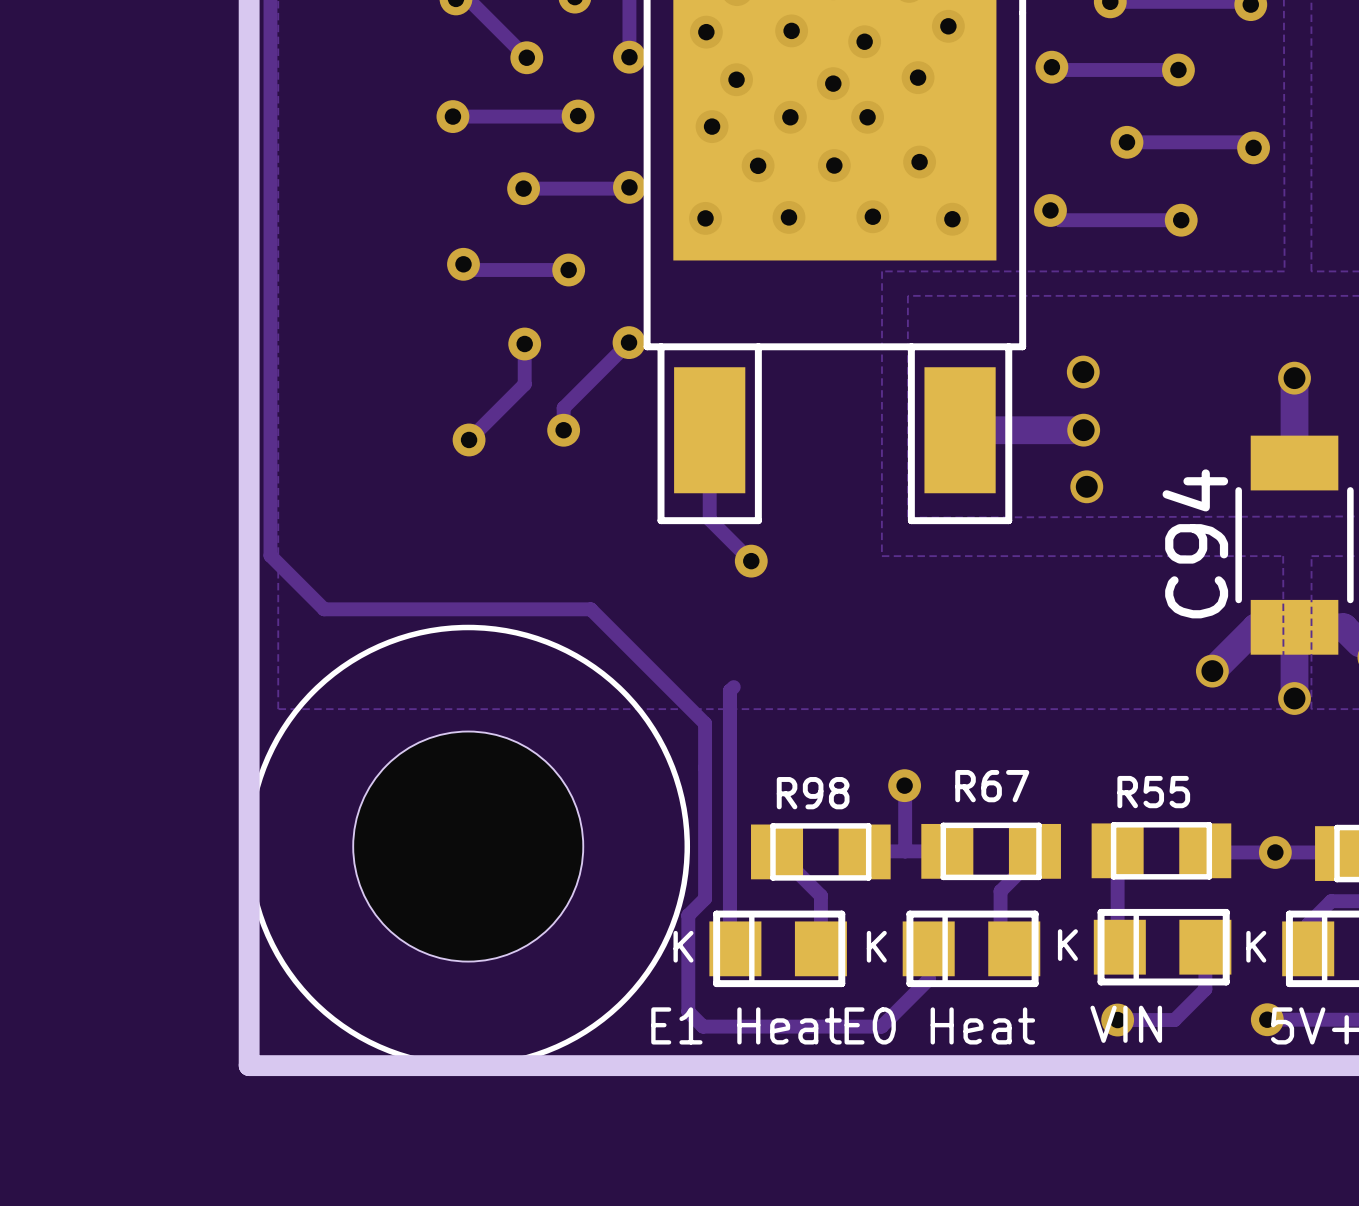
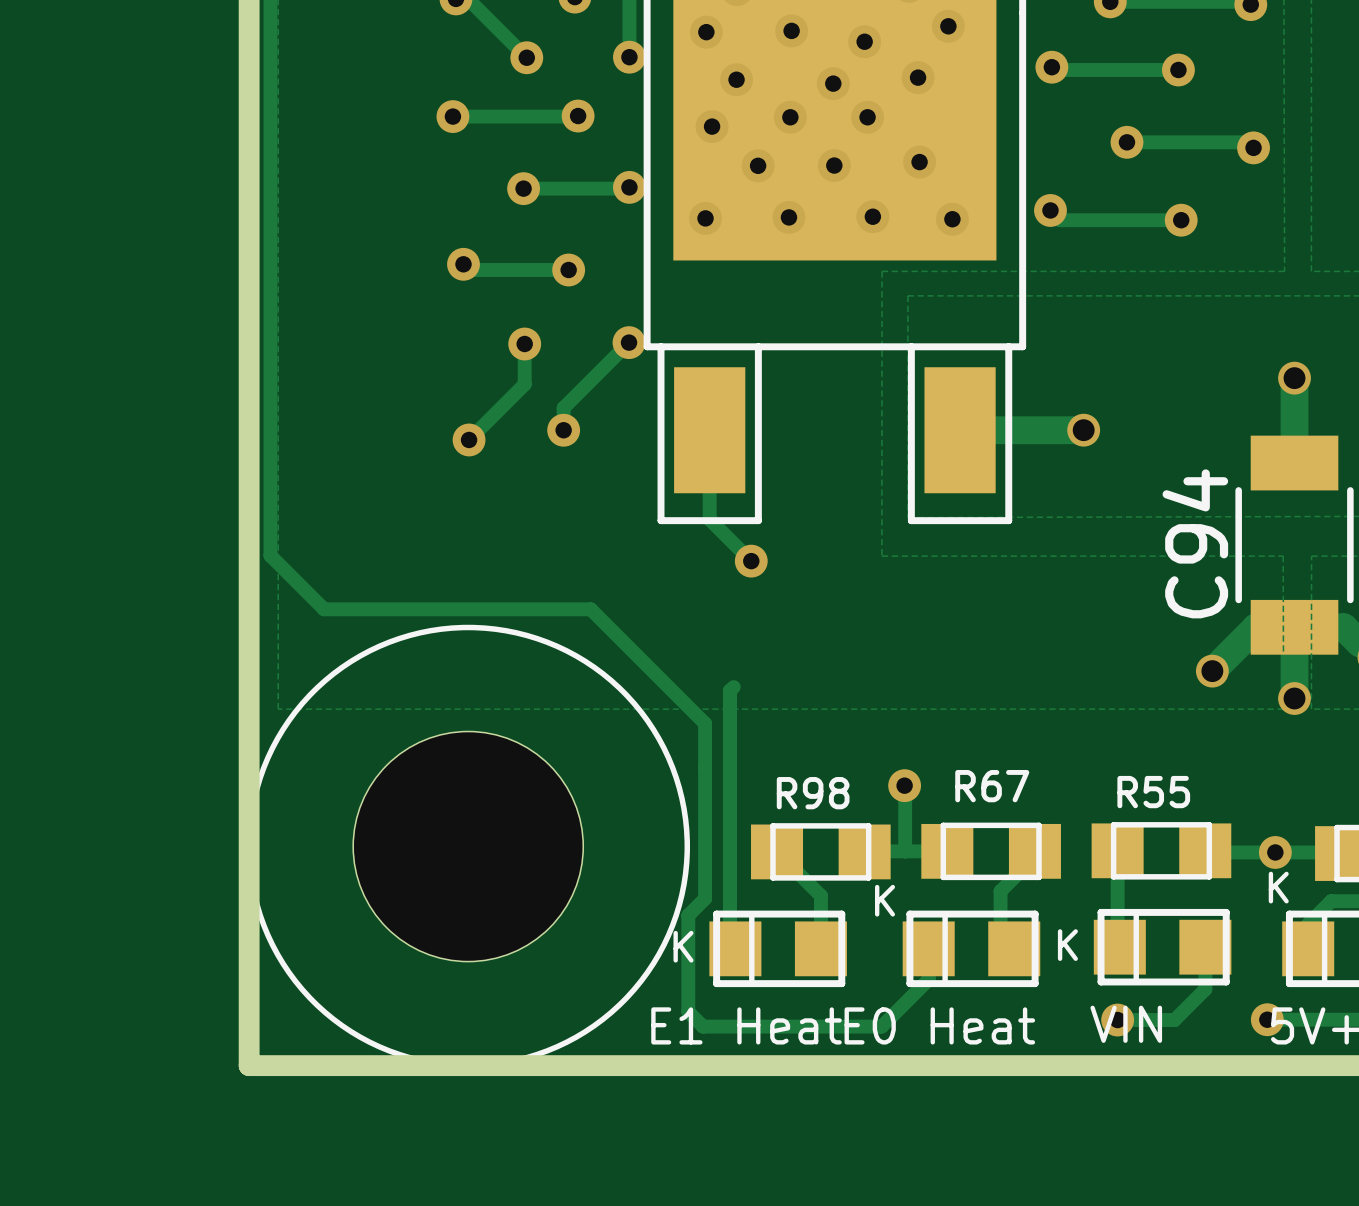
via: (1083, 372) -> none
via: (1086, 486) -> none
part text position: K (876, 946) -> K (885, 900)
part text position: K (1256, 946) -> K (1278, 887)

